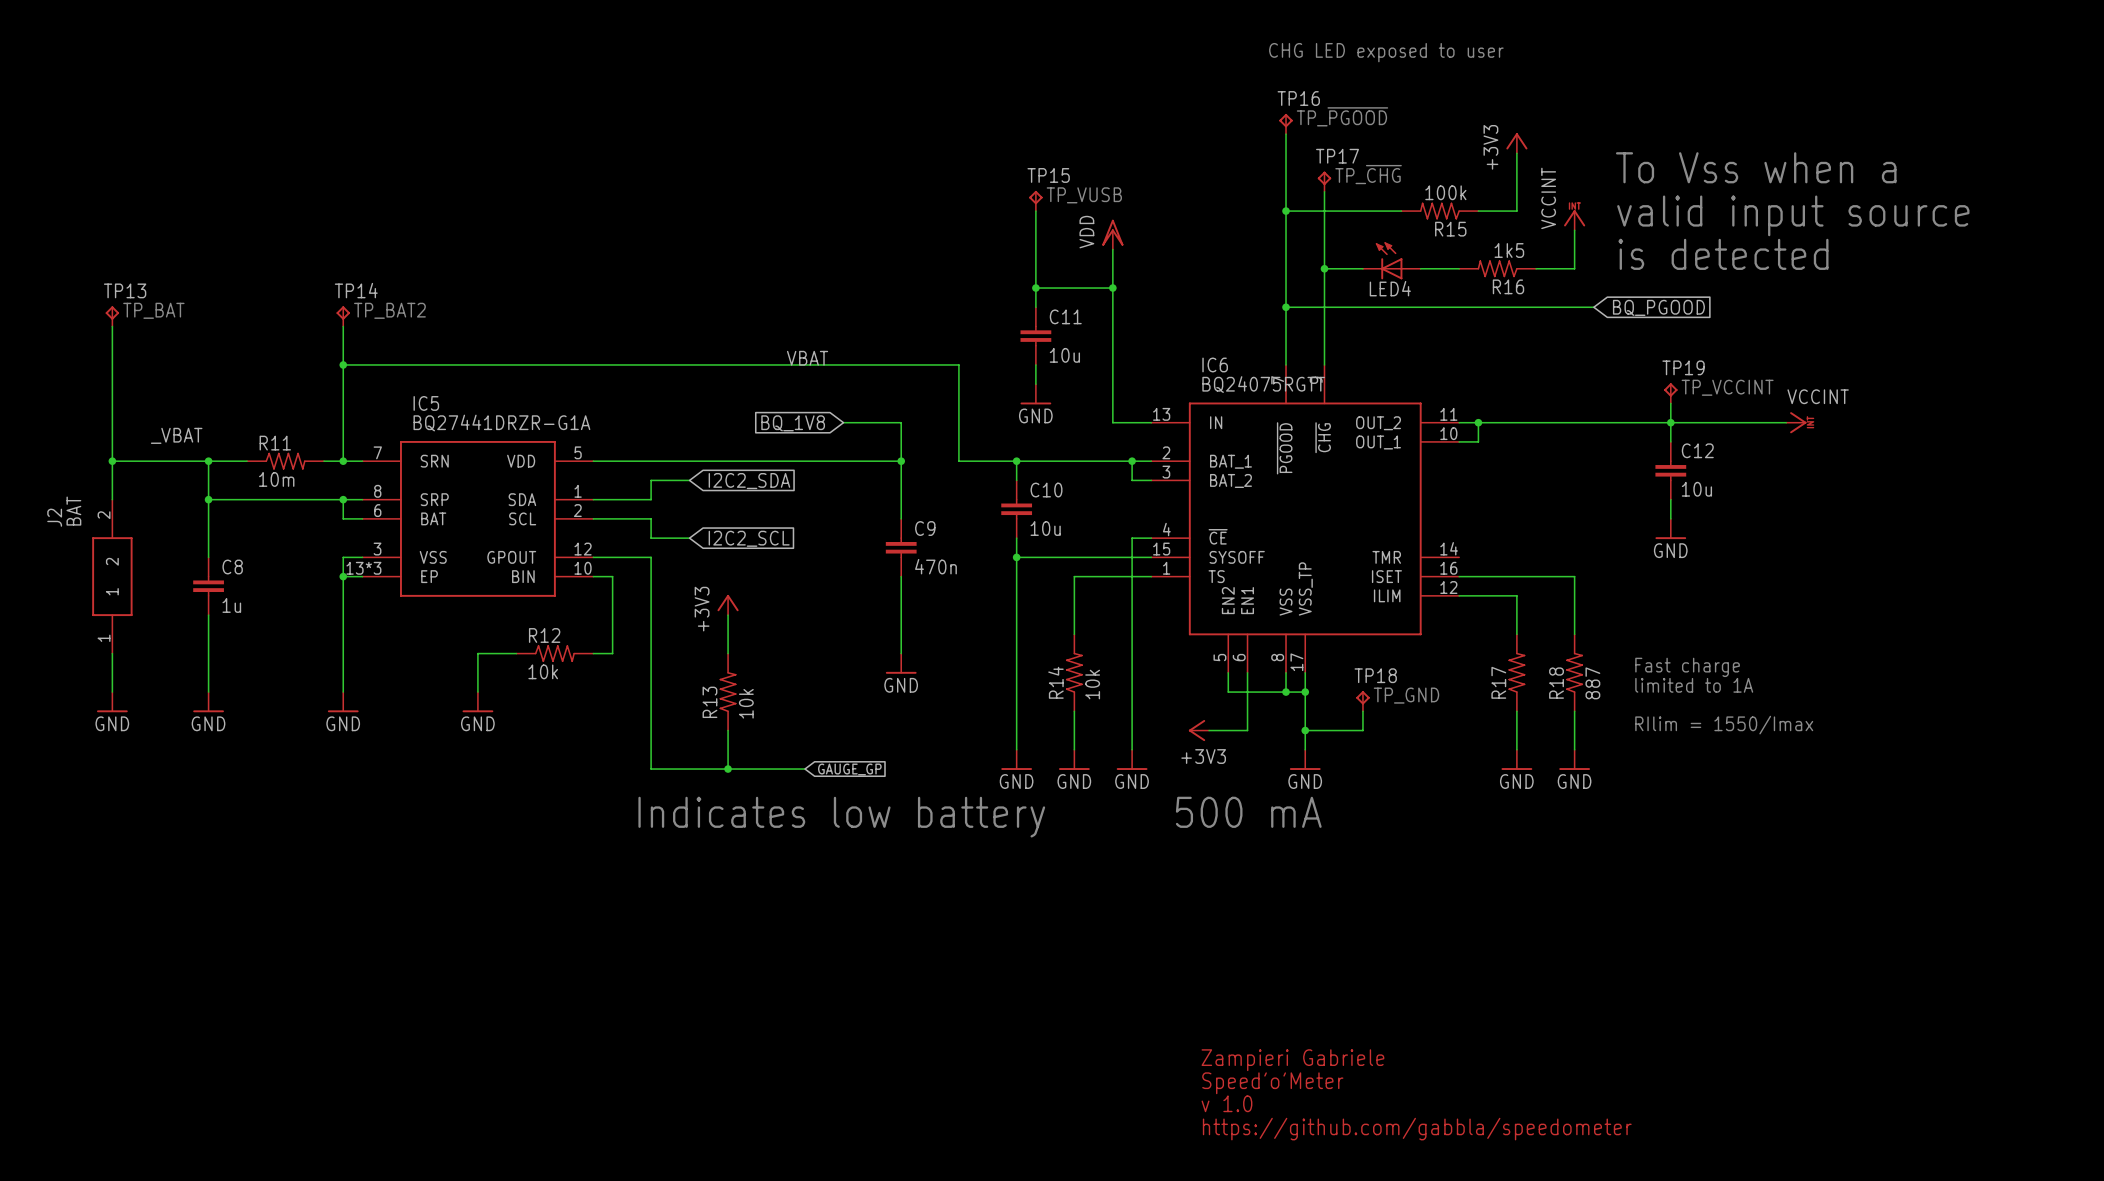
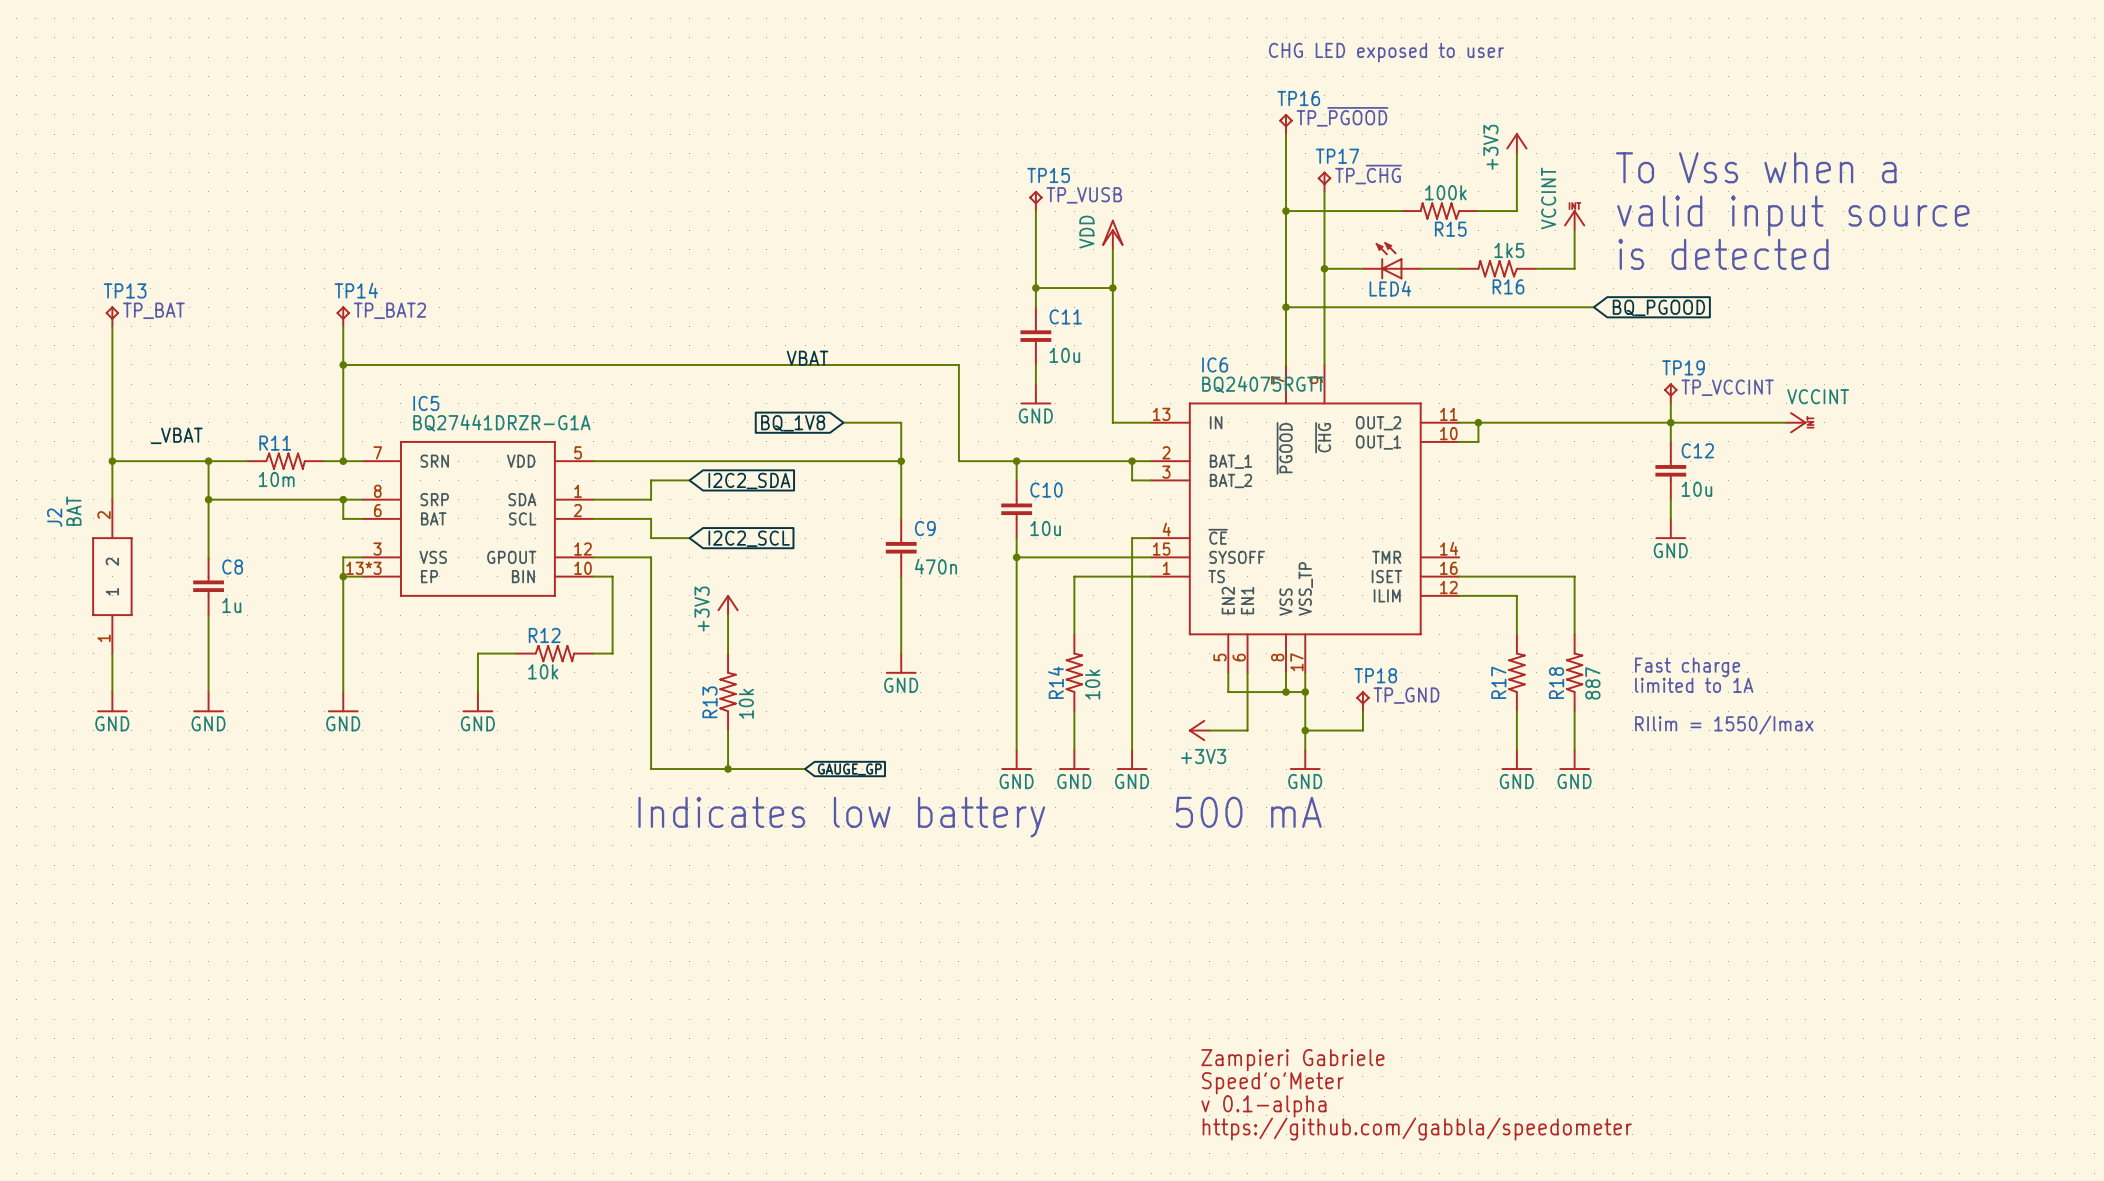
text: v 1.0 (1226, 1103) -> v 0.1-alpha (1263, 1106)

